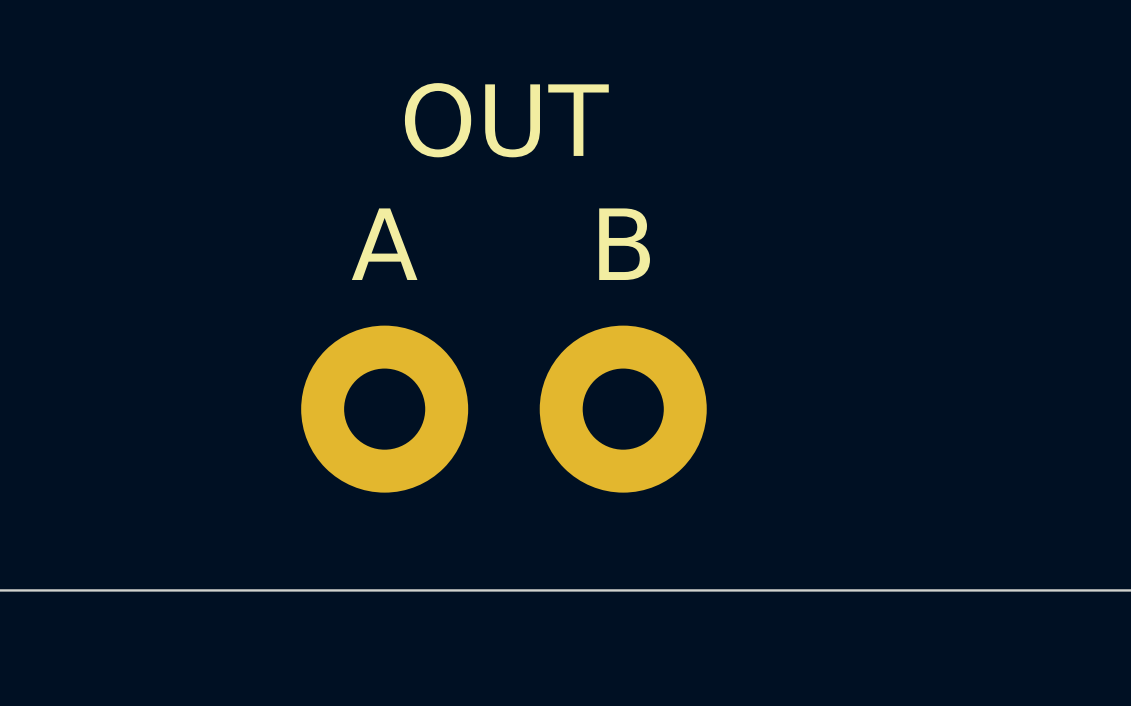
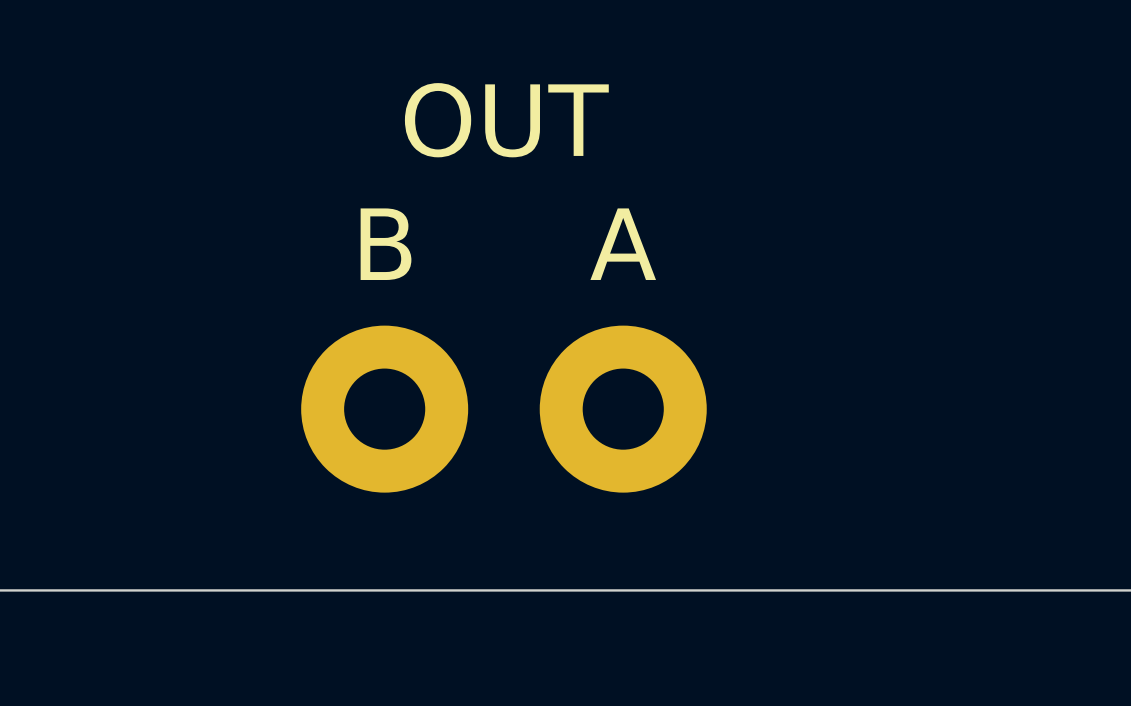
text: A (384, 244) -> B (386, 244)
text: B (624, 244) -> A (623, 244)

